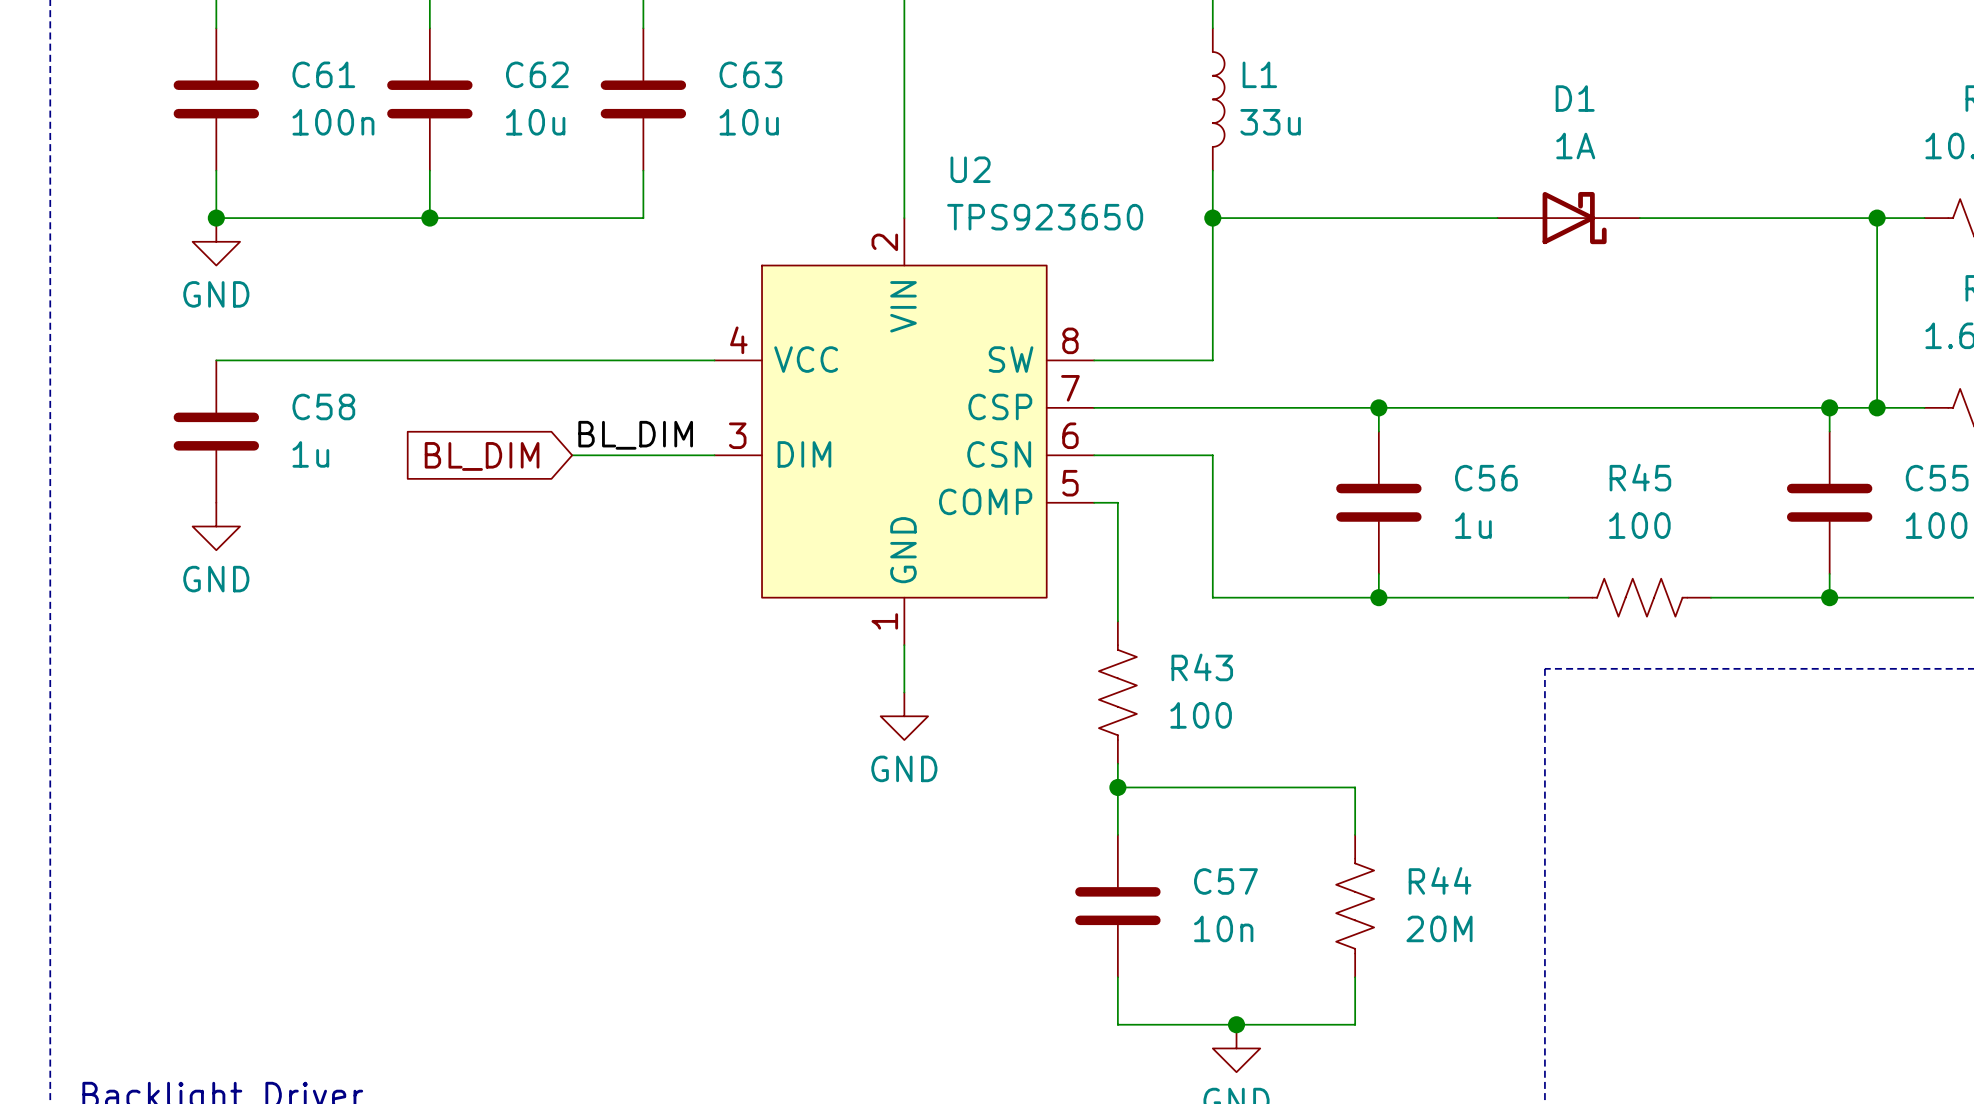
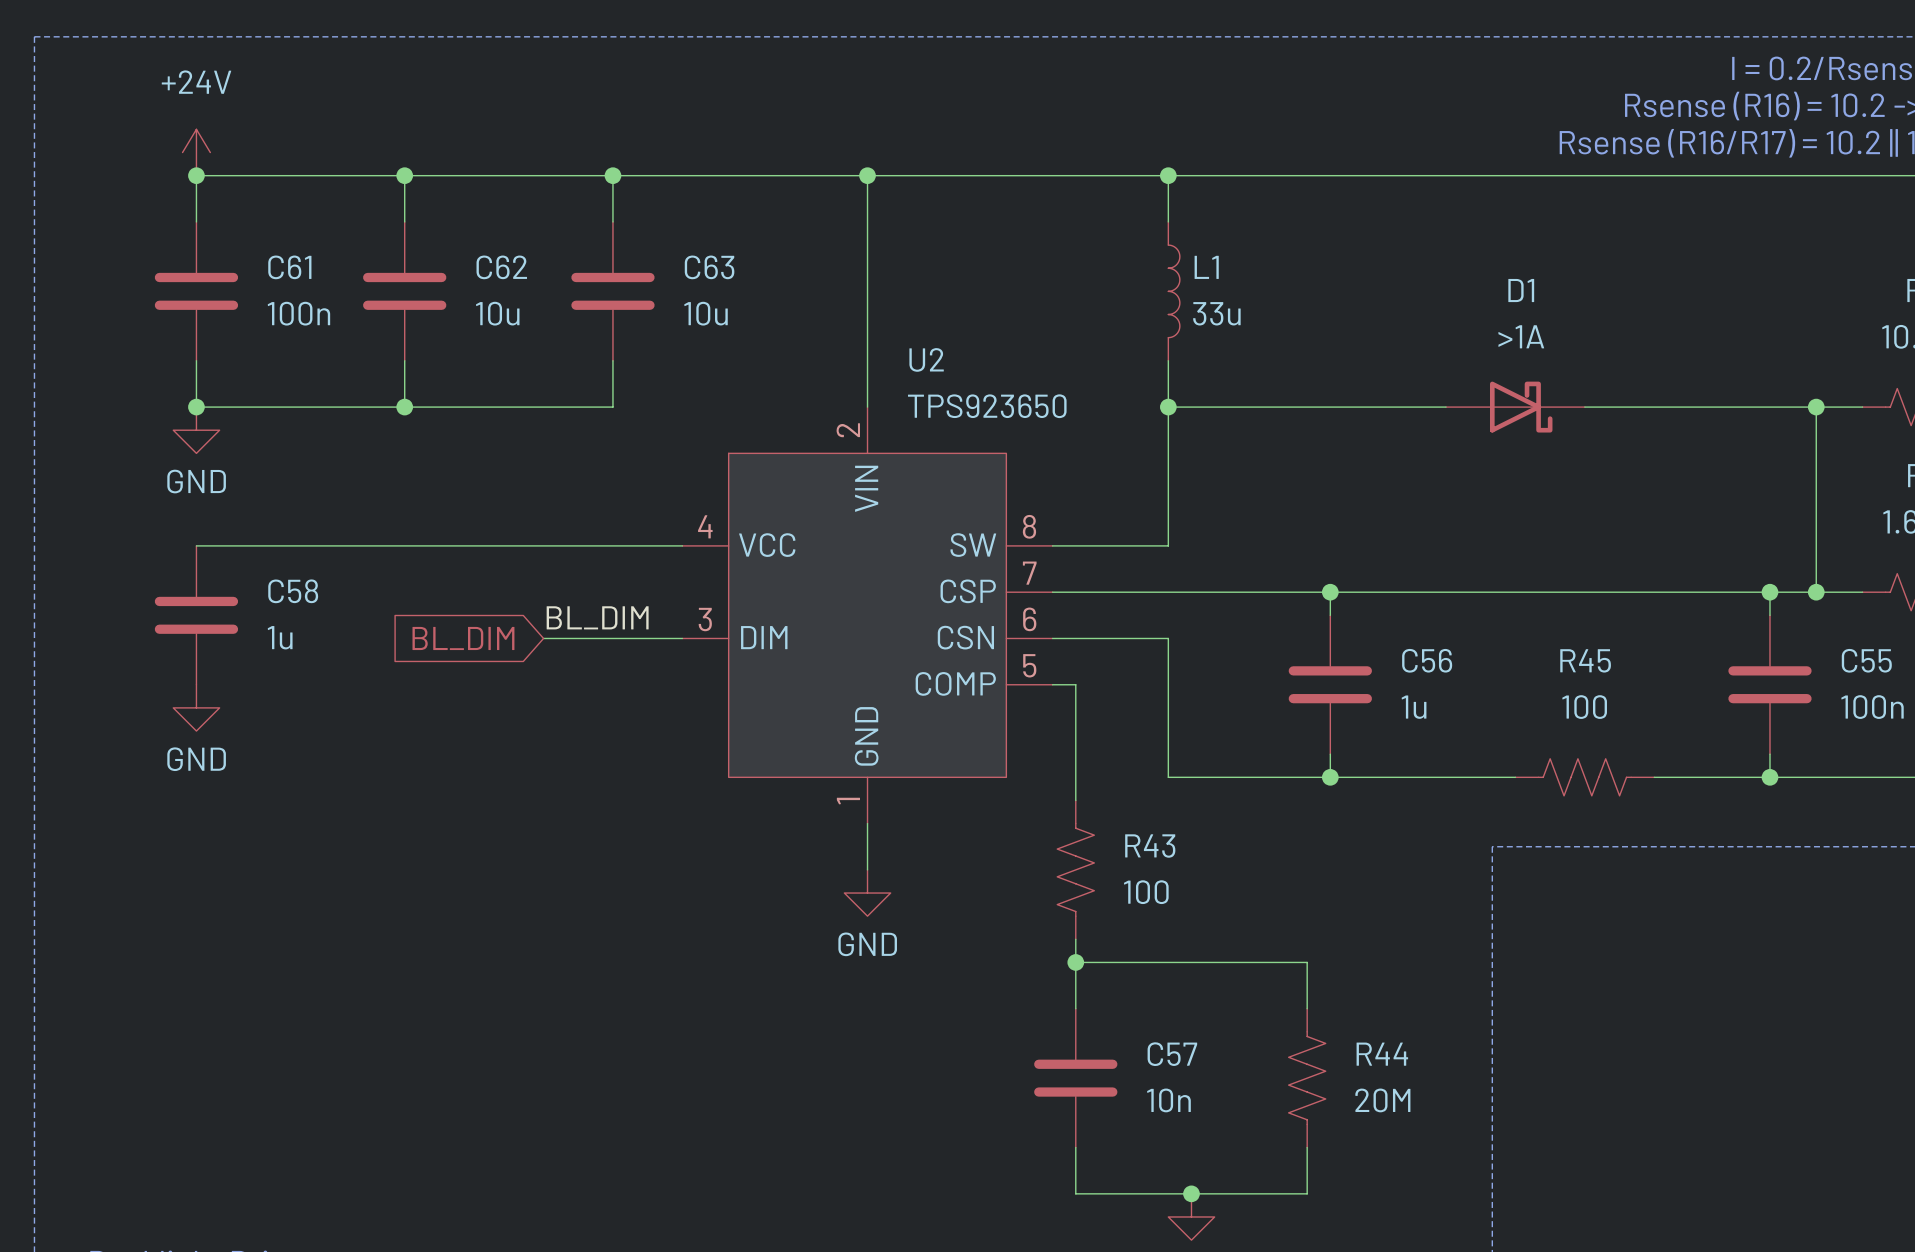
D1 value: 1A (1575, 146) -> >1A (1521, 336)

